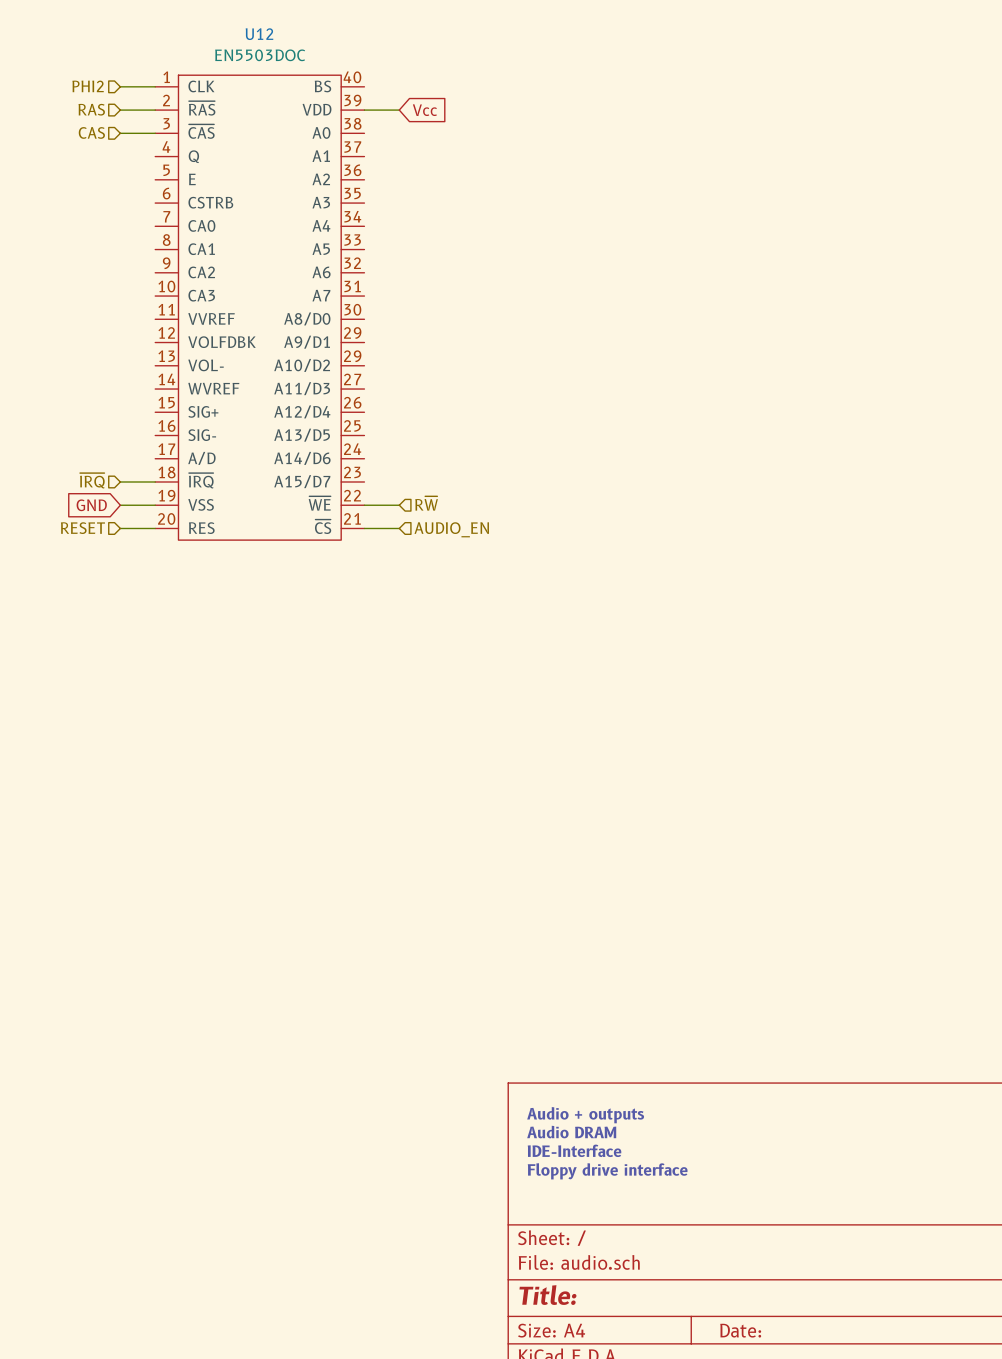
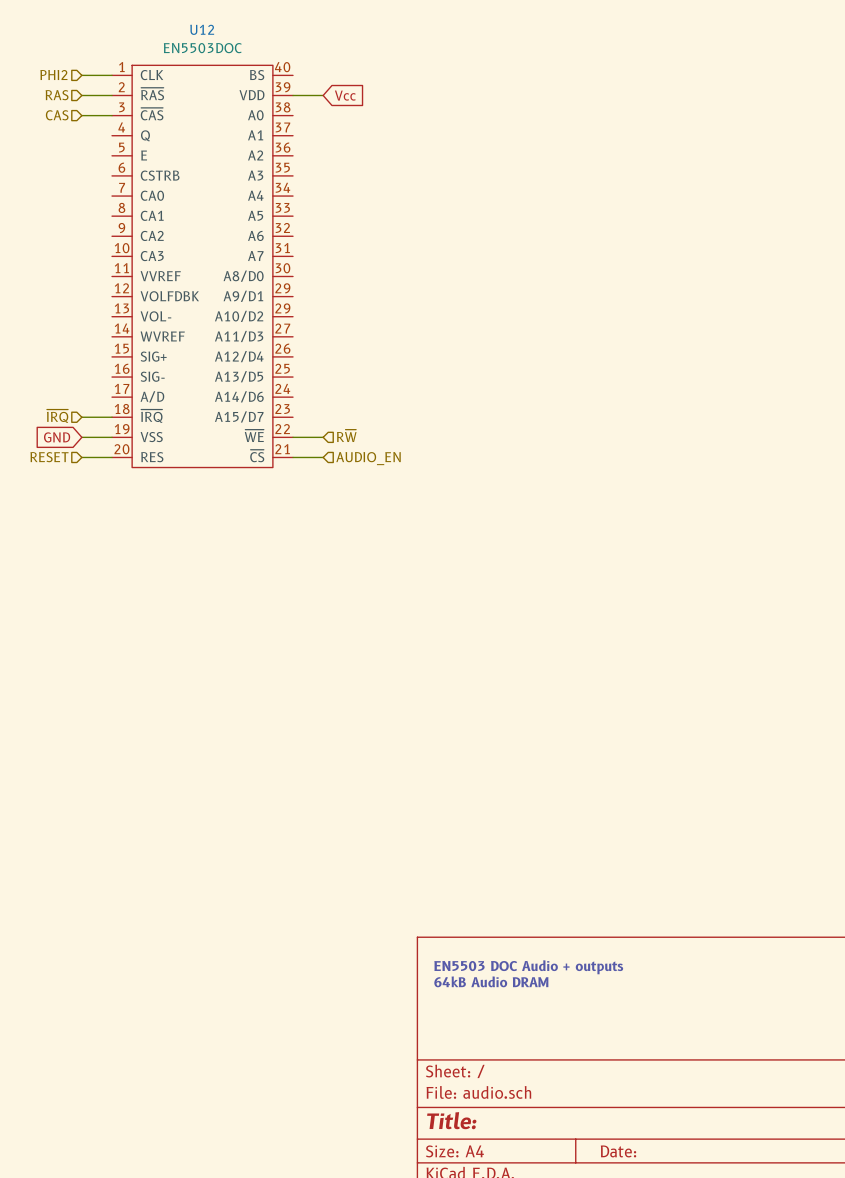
text: Audio + outputs (585, 1115) -> EN5503 DOC Audio + outputs (528, 967)
text: Audio DRAM (571, 1132) -> 64kB Audio DRAM (491, 981)
text: IDE-Interface (574, 1150) -> none
text: Floppy drive interface (607, 1171) -> none

